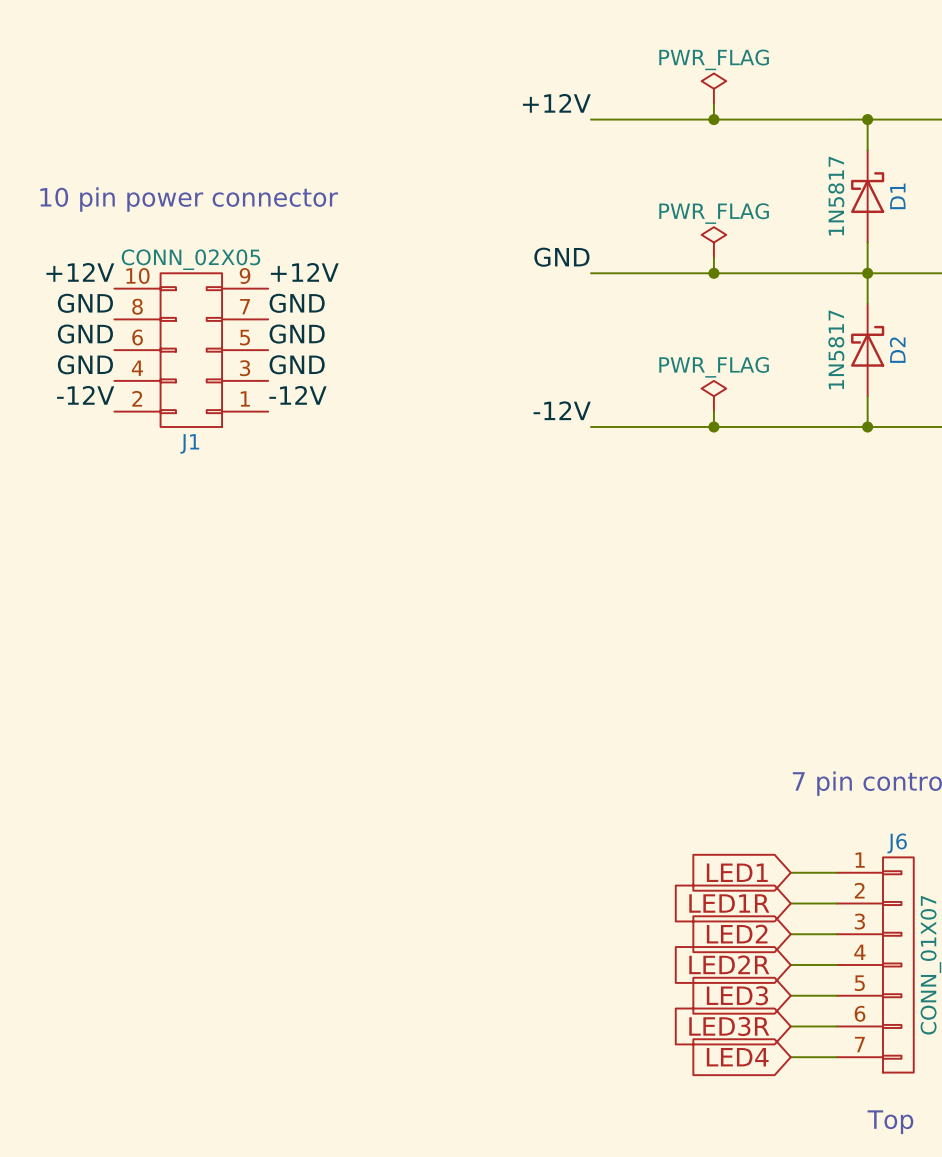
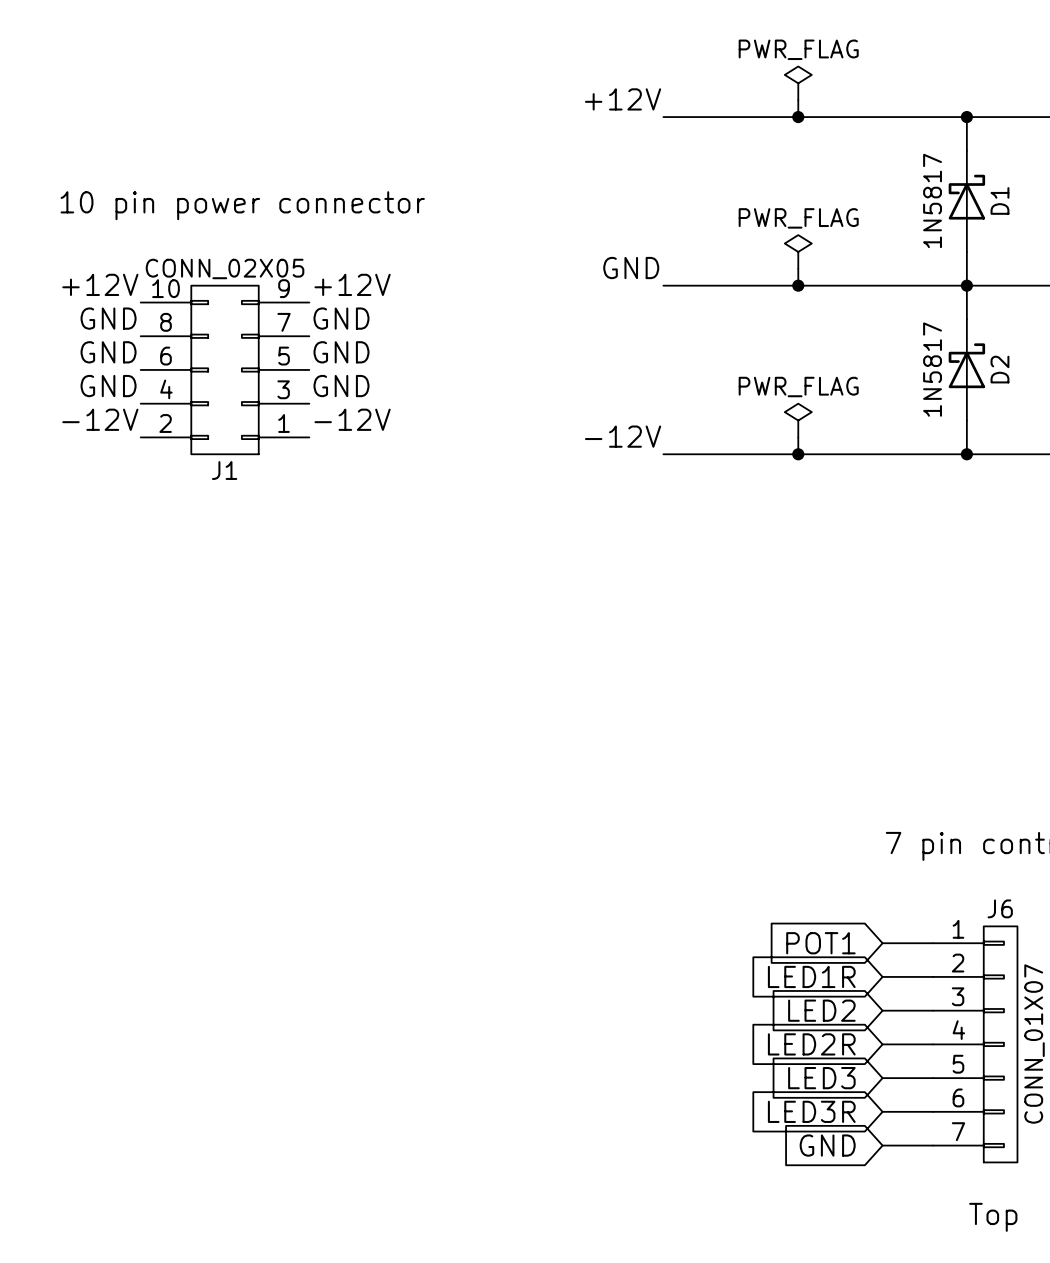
global label: LED1 (737, 872) -> POT1 (820, 943)
global label: LED4 (737, 1057) -> GND (827, 1145)

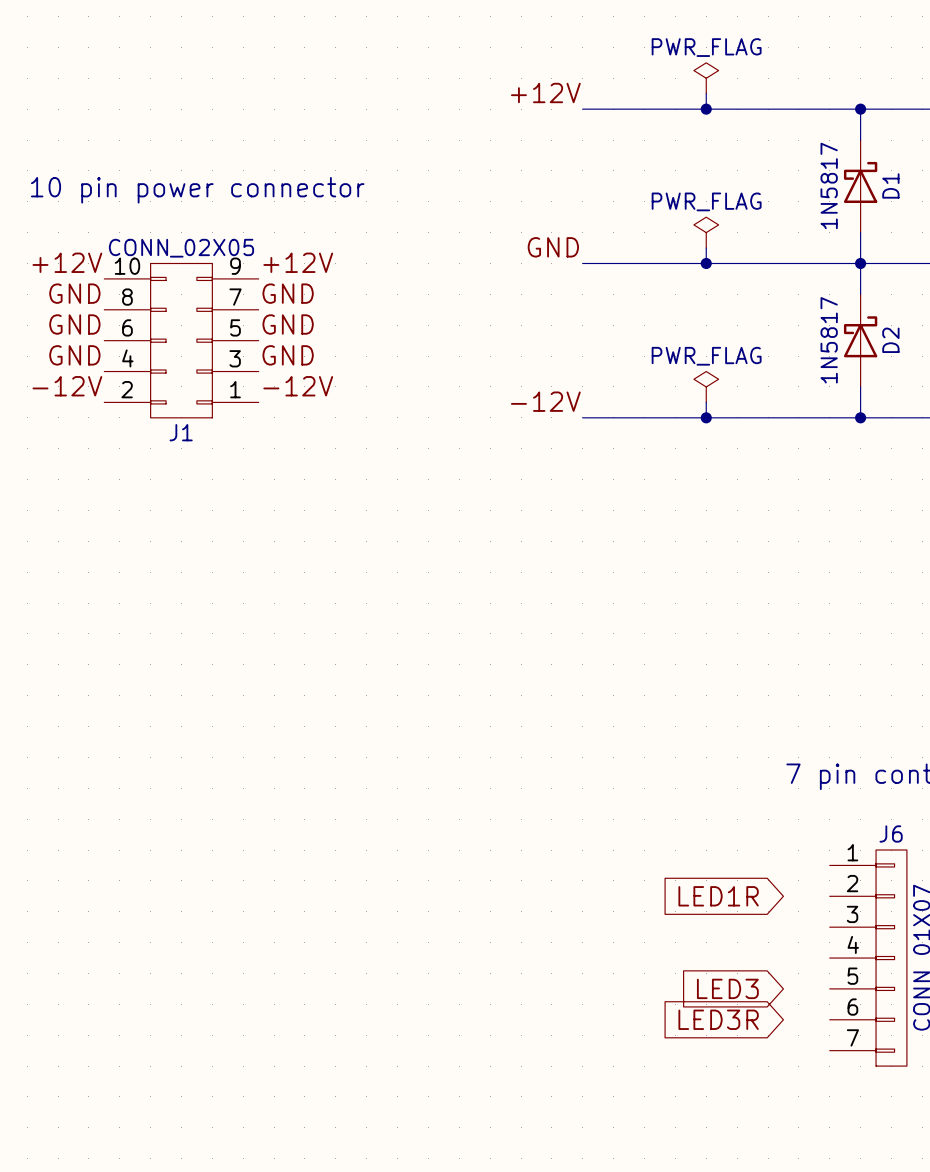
global label: POT1 (820, 943) -> none
wire: (882, 943) (933, 943) -> none
wire: (882, 976) (933, 976) -> none
global label: LED2 (821, 1010) -> none
wire: (882, 1010) (933, 1010) -> none
global label: LED2R (811, 1044) -> none
wire: (882, 1044) (933, 1044) -> none
wire: (882, 1078) (933, 1078) -> none
wire: (882, 1111) (933, 1111) -> none
global label: GND (827, 1145) -> none
wire: (882, 1145) (933, 1145) -> none
text: Top (993, 1217) -> none

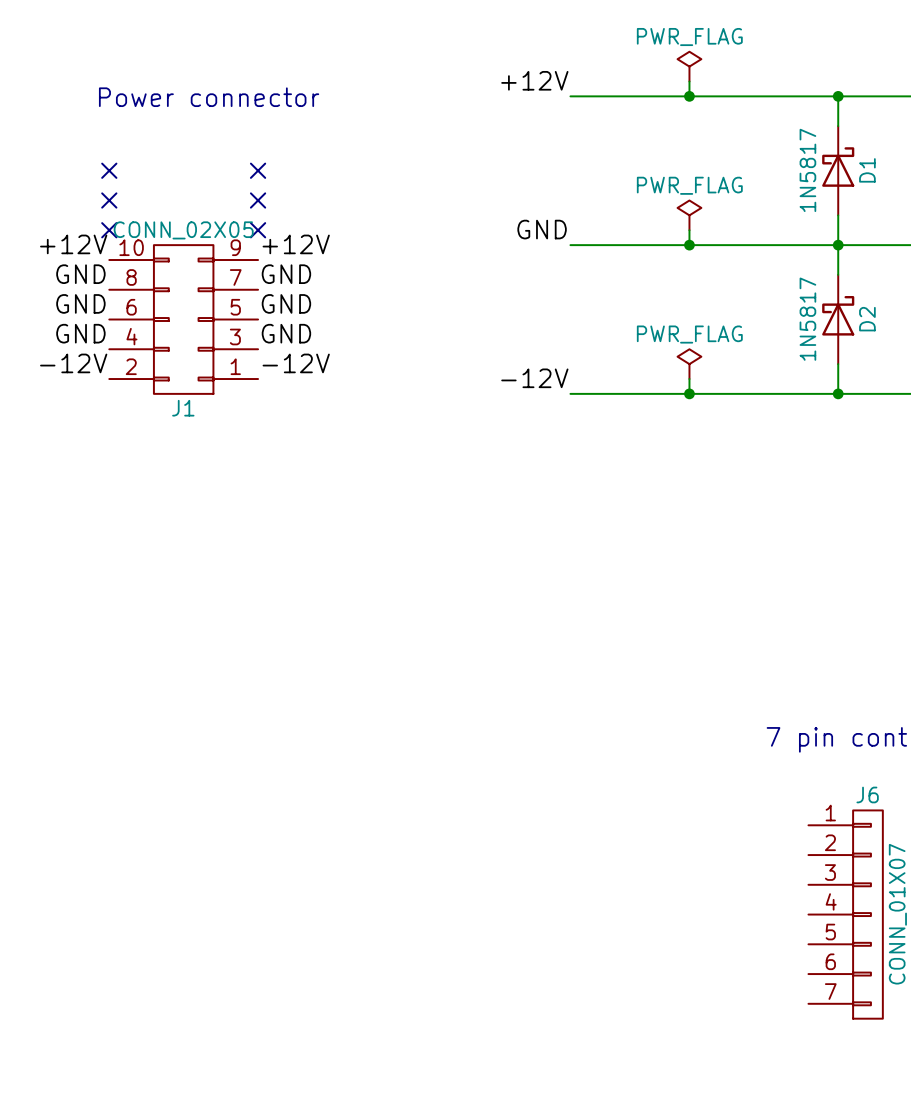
text: none -> Power connector (209, 97)
no-connect mark: none -> (109, 170)
no-connect mark: none -> (258, 170)
text: 10 pin power connector (197, 190) -> none
no-connect mark: none -> (109, 200)
no-connect mark: none -> (258, 200)
no-connect mark: none -> (109, 230)
no-connect mark: none -> (258, 230)
global label: LED1R (718, 896) -> none
global label: LED3 (727, 988) -> none
global label: LED3R (718, 1019) -> none

